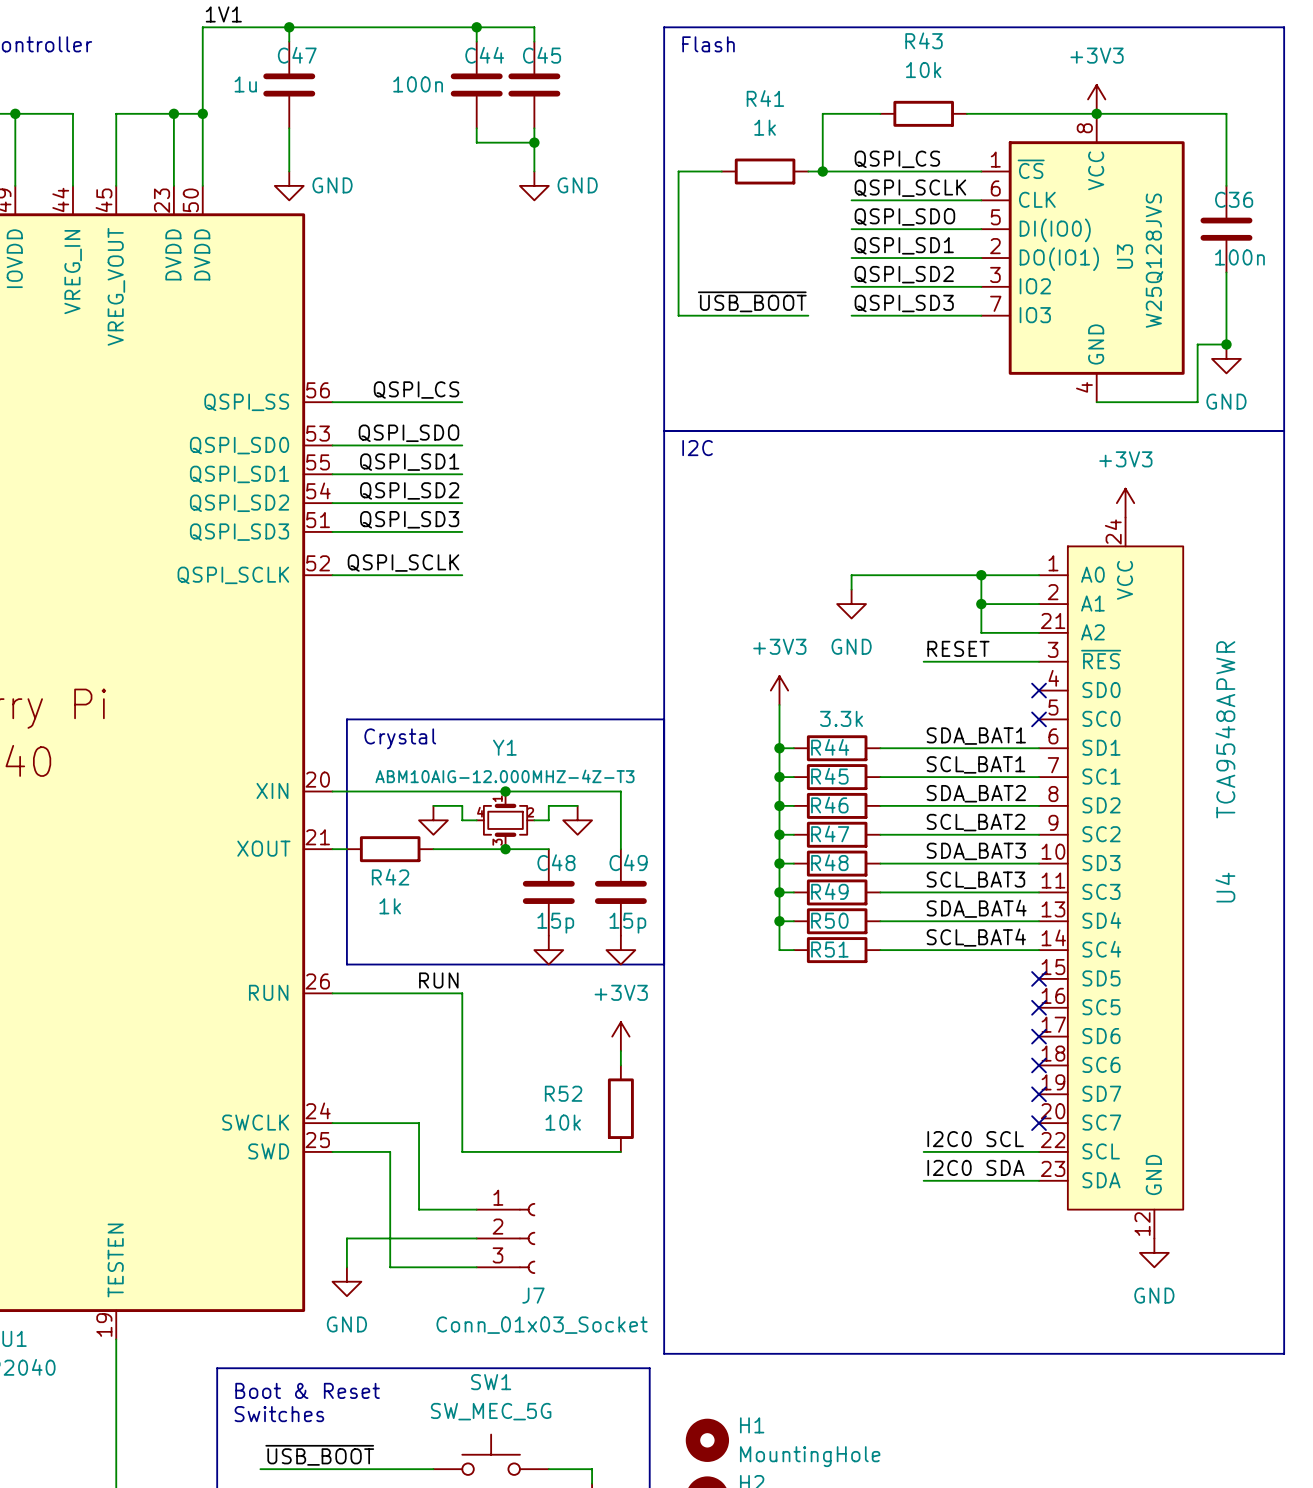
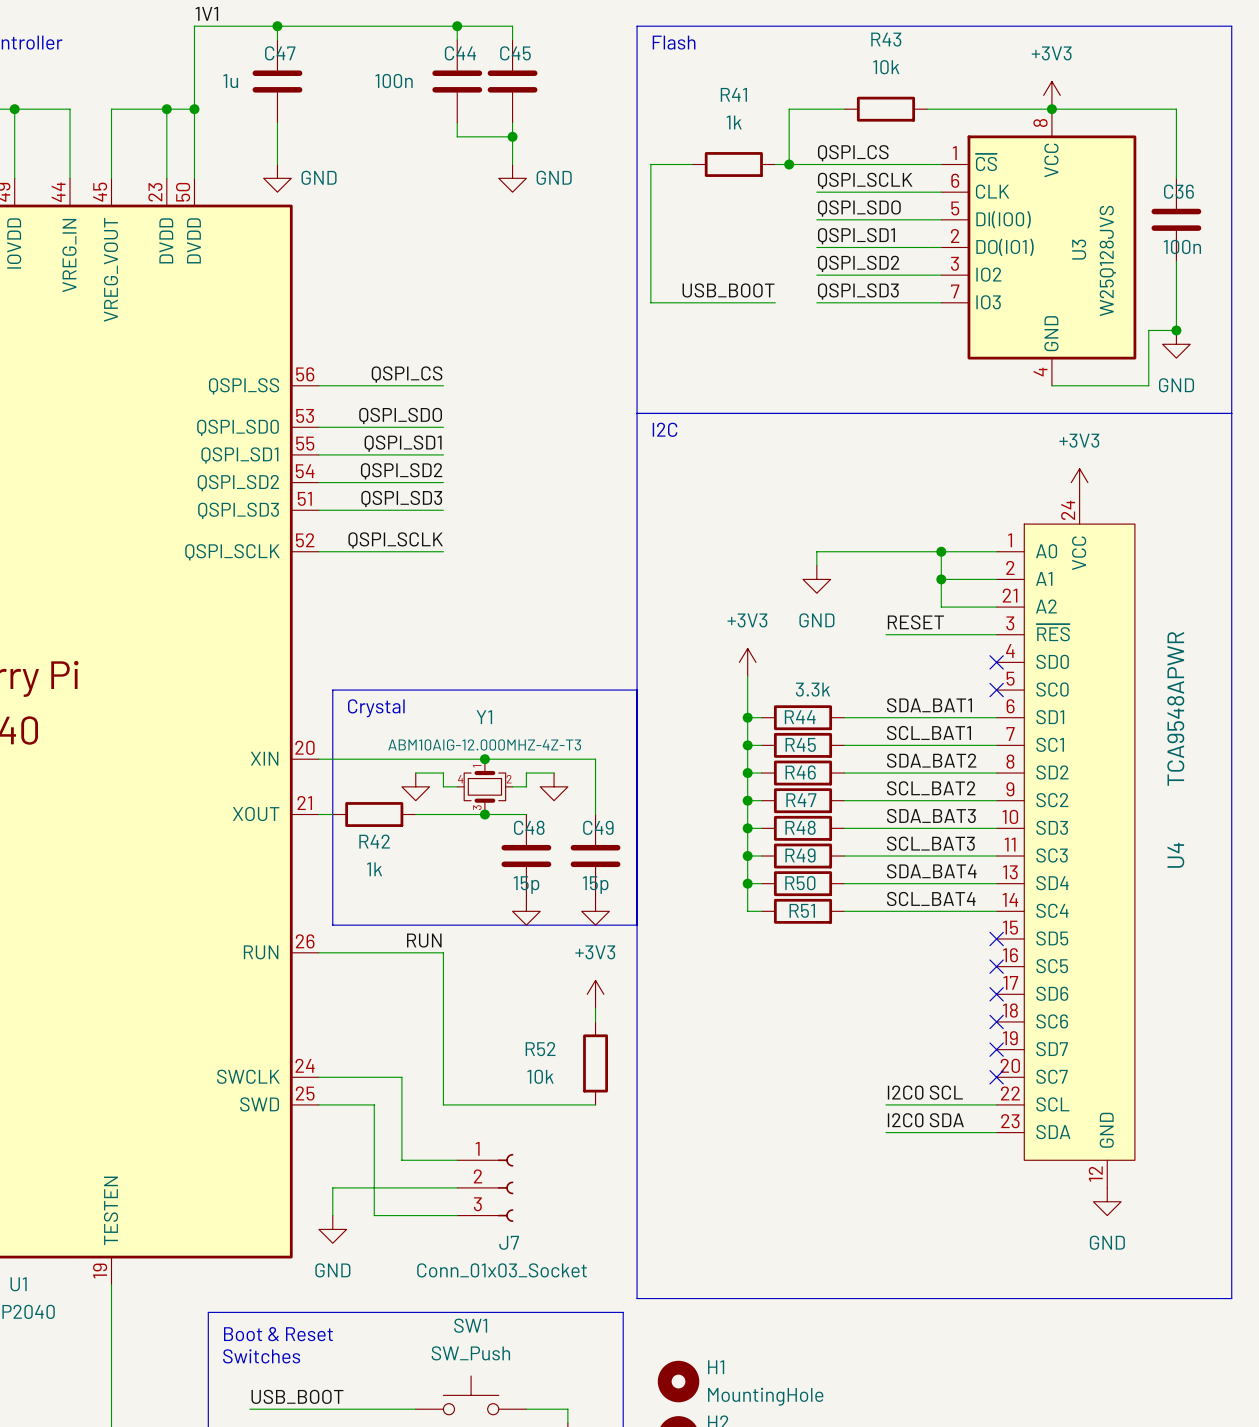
label: ~{USB_BOOT} (752, 301) -> USB_BOOT (728, 290)
SW1 value: SW_MEC_5G (491, 1411) -> SW_Push (470, 1353)
label: ~{USB_BOOT} (319, 1455) -> USB_BOOT (297, 1396)

